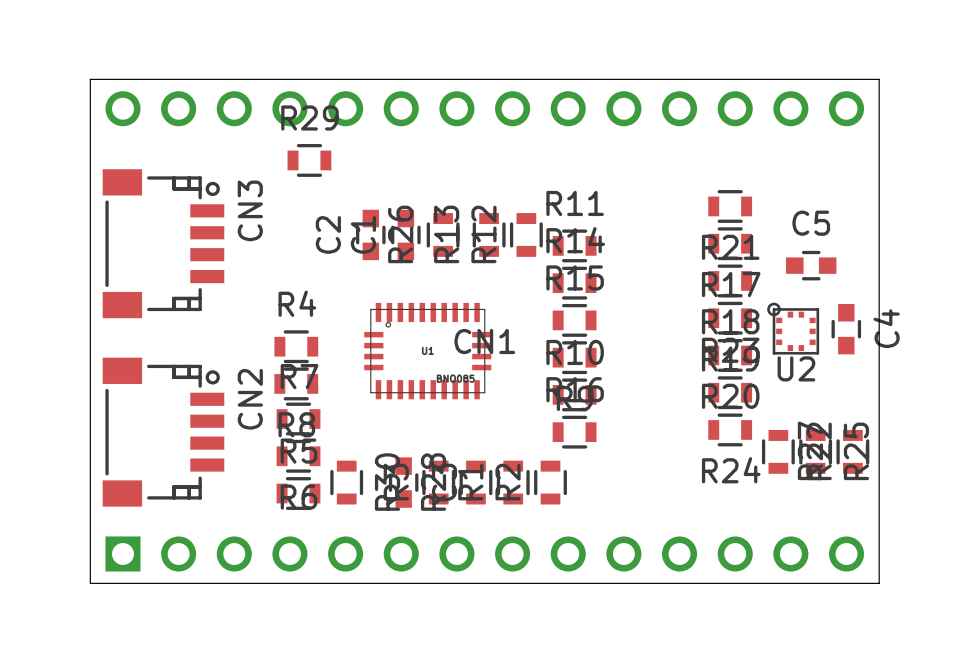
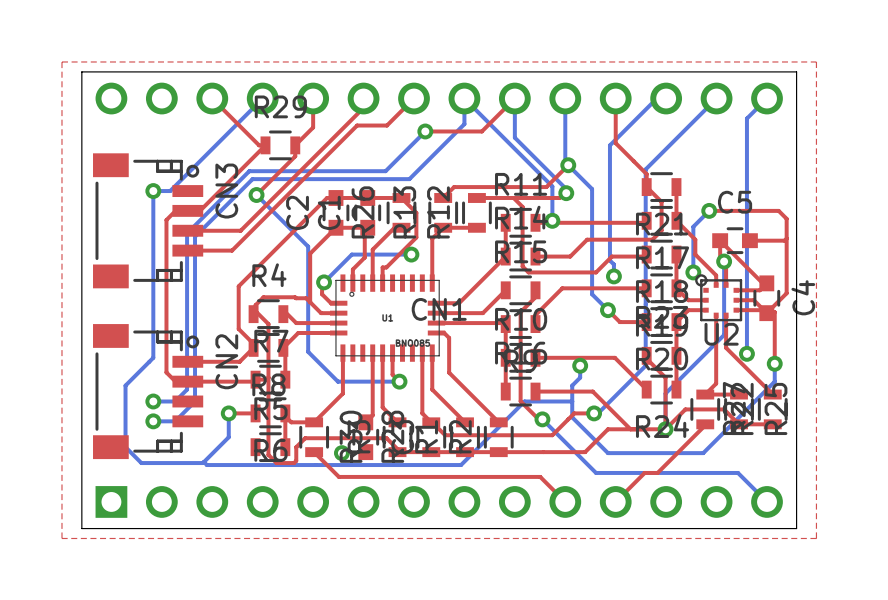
top zone outline: none -> (61, 61) (61, 538) (816, 538) (816, 61) (61, 61)
top track: none -> (212, 98) (259, 145) (265, 145) (199, 210) (175, 210) (166, 220) (166, 372) (175, 381) (253, 381) (268, 377)
bottom track: none -> (262, 98) (170, 191) (153, 191) (153, 357) (125, 385) (125, 447) (141, 463) (202, 463) (228, 437) (228, 413)
top track: none -> (313, 98) (313, 127) (295, 145) (295, 156) (256, 195)
top track: none -> (363, 98) (363, 107) (240, 230) (187, 230)
top track: none -> (414, 98) (387, 125) (357, 125) (232, 250) (187, 250)
top track: none -> (514, 98) (481, 131) (425, 131)
bottom track: none -> (514, 98) (514, 137) (566, 189) (566, 193)
bottom track: none -> (565, 98) (565, 162) (592, 189) (592, 294) (607, 310)
top track: none -> (615, 98) (615, 143) (646, 174) (646, 187) (661, 201) (661, 230) (652, 239) (587, 239) (570, 256) (535, 256)
bottom track: none -> (666, 98) (656, 98) (609, 145) (609, 260) (613, 264) (613, 276)
bottom track: none -> (716, 98) (645, 169) (645, 365) (598, 413) (594, 413)
bottom track: none -> (767, 98) (746, 118) (746, 353)
bottom track: none -> (425, 131) (385, 171) (249, 171) (187, 233) (187, 389) (175, 401) (153, 401)
via: none -> (425, 131)
top track: none -> (568, 165) (546, 187) (454, 187) (443, 197)
via: none -> (568, 165)
top track: none -> (676, 187) (676, 220) (695, 239) (695, 254) (716, 275) (716, 285)
via: none -> (153, 191)
top track: none -> (566, 193) (559, 197) (476, 197)
via: none -> (566, 193)
bottom track: none -> (256, 195) (308, 246) (308, 351) (337, 381) (399, 381)
via: none -> (256, 195)
top track: none -> (513, 197) (522, 206) (522, 266) (528, 272) (596, 272) (611, 256) (644, 256) (646, 254)
top track: none -> (709, 210) (778, 210) (786, 218) (786, 293) (766, 313)
bottom track: none -> (709, 210) (693, 226) (693, 272)
via: none -> (709, 210)
bottom track: none -> (552, 220) (552, 186) (464, 98) (464, 124) (409, 179) (252, 179) (195, 236) (195, 401) (175, 421) (153, 421)
via: none -> (552, 220)
top track: none -> (646, 220) (644, 222) (535, 222)
top track: none -> (505, 222) (505, 256) (459, 303) (436, 303)
top track: none -> (401, 227) (394, 227) (372, 249) (372, 283)
top track: none -> (476, 227) (443, 227) (432, 238) (432, 283)
top track: none -> (786, 238) (784, 240) (749, 240)
bottom track: none -> (411, 254) (351, 254) (324, 282)
via: none -> (411, 254)
top track: none -> (676, 254) (676, 288) (688, 300) (706, 300)
bottom track: none -> (724, 261) (724, 334) (665, 393) (665, 429)
via: none -> (724, 261)
via: none -> (693, 272)
via: none -> (613, 276)
top track: none -> (324, 282) (322, 284) (322, 294) (331, 303) (338, 303)
via: none -> (324, 282)
top track: none -> (352, 283) (352, 269) (364, 257) (364, 230) (367, 227) (335, 227) (310, 253) (310, 302)
top track: none -> (382, 283) (382, 267) (386, 267) (416, 237) (416, 212) (401, 197) (327, 197) (238, 286) (238, 329) (255, 345) (239, 361) (187, 361)
top track: none -> (726, 285) (726, 263) (720, 257) (720, 240) (762, 283) (766, 283) (759, 290) (736, 290)
top track: none -> (646, 288) (562, 288) (535, 315) (535, 324)
top track: none -> (505, 290) (482, 313) (436, 313)
top track: none -> (535, 290) (535, 297) (520, 312) (520, 401) (538, 419) (542, 419)
top track: none -> (736, 300) (753, 300) (766, 313)
top track: none -> (607, 310) (619, 322) (646, 322)
via: none -> (607, 310)
top track: none -> (706, 310) (688, 310) (676, 322) (676, 389)
top track: none -> (736, 310) (763, 310)
top track: none -> (285, 312) (296, 323) (338, 323)
top track: none -> (338, 313) (321, 313) (306, 298) (263, 297) (255, 305) (255, 312) (268, 324) (268, 454) (276, 463) (294, 463) (296, 460) (296, 447) (305, 438) (386, 438) (397, 449) (397, 452) (585, 452) (607, 429) (665, 429)
top track: none -> (766, 313) (774, 312) (774, 363)
top track: none -> (716, 315) (716, 383) (705, 394) (739, 394)
top track: none -> (726, 315) (726, 347) (772, 394)
top track: none -> (436, 323) (504, 323) (505, 391)
top track: none -> (338, 333) (298, 333) (285, 345) (285, 379)
top track: none -> (436, 333) (444, 333) (449, 337) (449, 372) (498, 422)
top track: none -> (342, 353) (342, 393) (314, 422) (291, 422) (285, 416)
top track: none -> (372, 353) (372, 415) (365, 422)
top track: none -> (382, 353) (382, 407) (397, 422)
top track: none -> (392, 353) (392, 374) (399, 381)
top track: none -> (422, 353) (422, 413) (445, 435) (552, 435) (574, 413) (594, 413)
top track: none -> (432, 353) (432, 389) (465, 422)
via: none -> (746, 353)
top track: none -> (646, 355) (646, 358) (665, 377) (665, 429)
top track: none -> (535, 357) (614, 357) (646, 389)
bottom track: none -> (774, 363) (774, 381) (703, 453) (607, 453) (572, 417) (572, 385) (580, 377) (580, 365)
via: none -> (774, 363)
via: none -> (580, 365)
via: none -> (399, 381)
top track: none -> (535, 391) (592, 391) (630, 429)
via: none -> (153, 401)
bottom track: none -> (572, 401) (524, 401) (461, 465) (206, 465) (203, 462)
top track: none -> (228, 413) (255, 413)
via: none -> (228, 413)
top track: none -> (285, 413) (285, 447)
via: none -> (594, 413)
bottom track: none -> (542, 419) (596, 472) (738, 472) (767, 501)
via: none -> (542, 419)
via: none -> (153, 421)
top track: none -> (705, 424) (657, 472) (644, 472) (615, 501)
top track: none -> (772, 424) (739, 424) (724, 409) (685, 409) (665, 429)
via: none -> (665, 429)
top track: none -> (314, 452) (338, 476) (540, 476) (565, 501)
via: none -> (341, 453)

